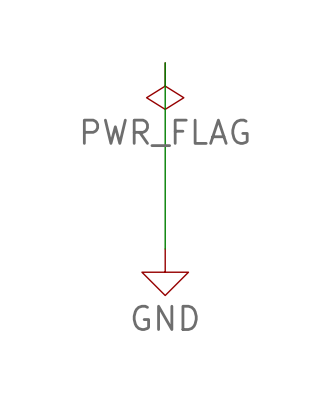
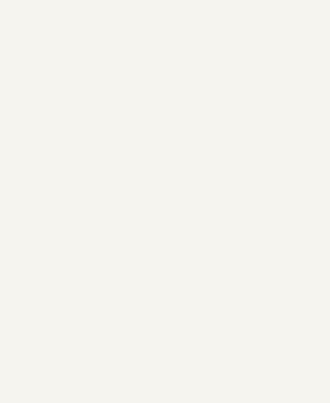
wire: (165, 62) (165, 248) -> none
power symbol: PWR_FLAG (165, 86) -> none
power symbol: GND (165, 272) -> none

